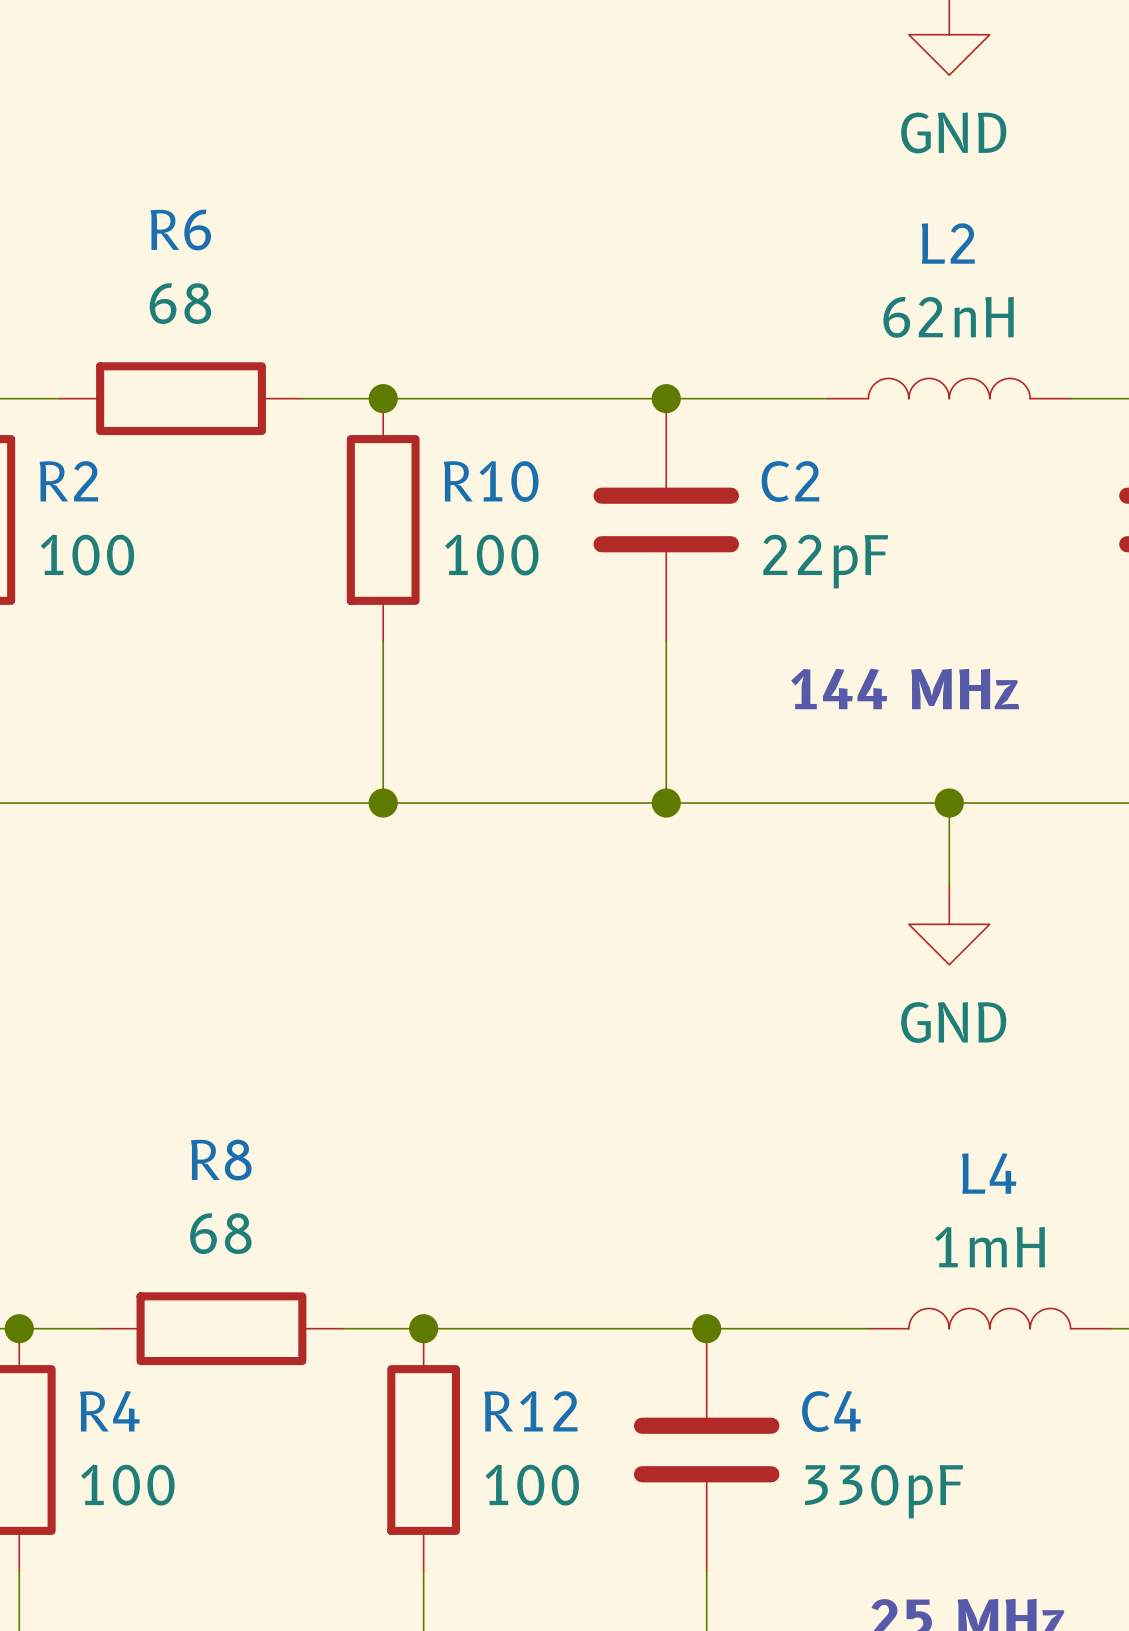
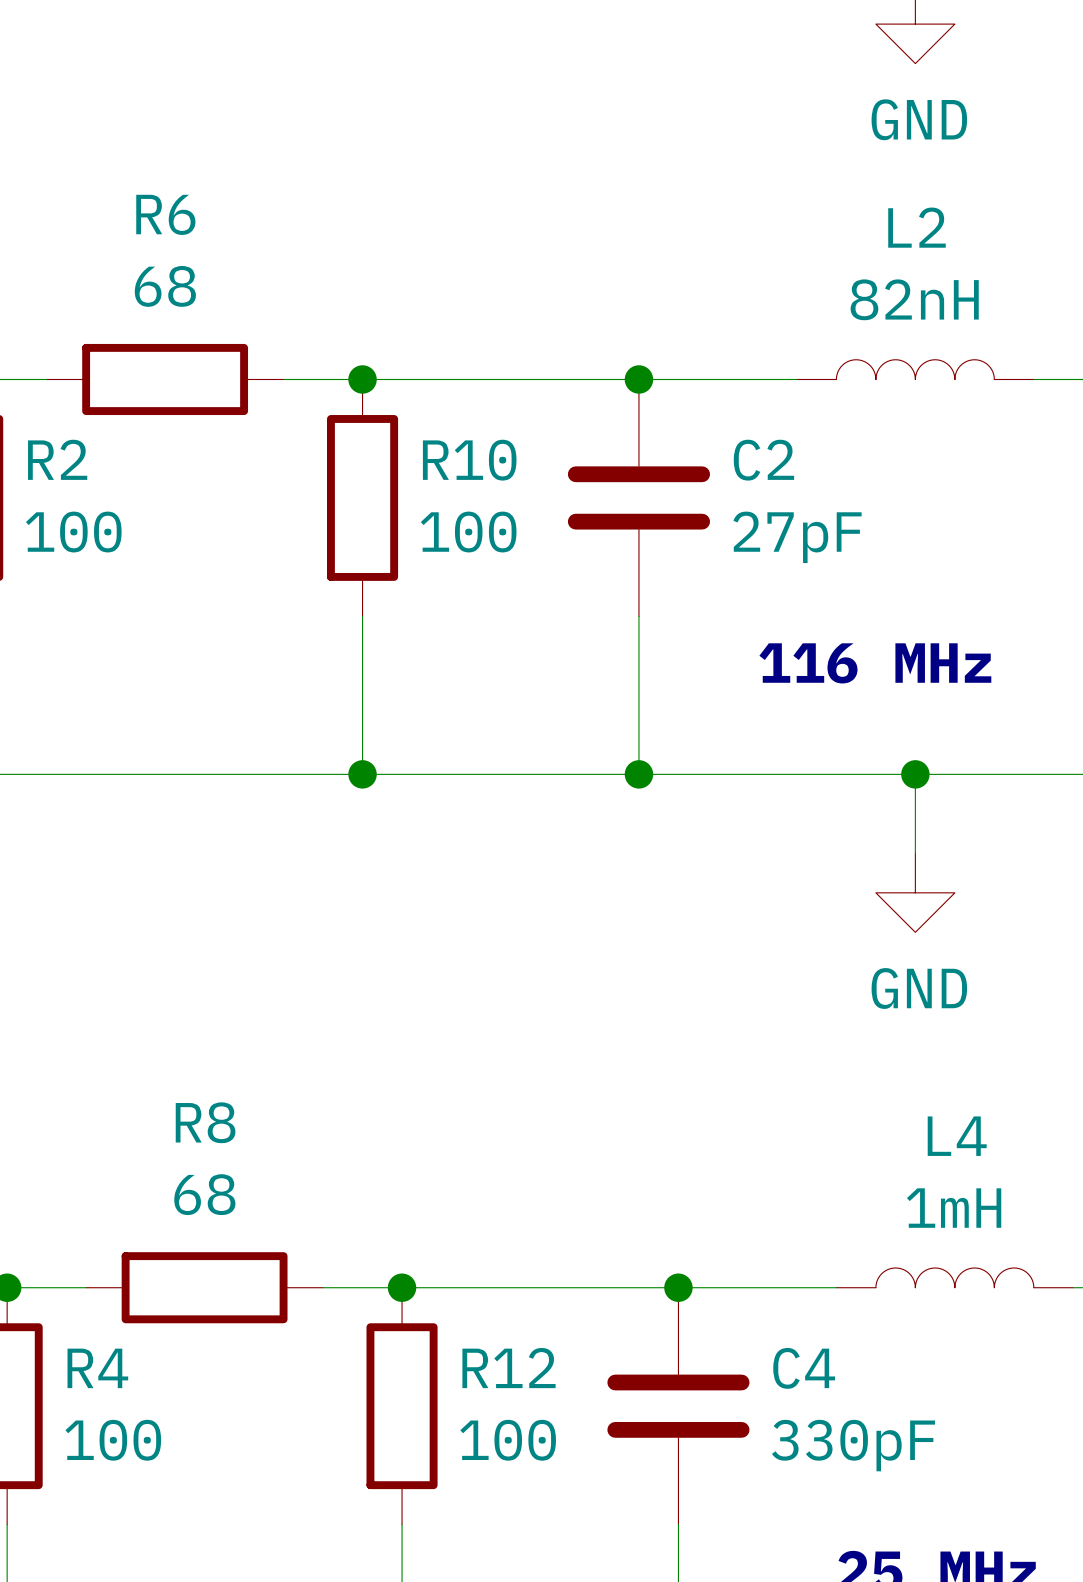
L2 value: 62nH (948, 317) -> 82nH (914, 299)
C2 value: 22pF (825, 561) -> 27pF (797, 537)
text: 144 MHz (905, 689) -> 116 MHz (875, 663)

